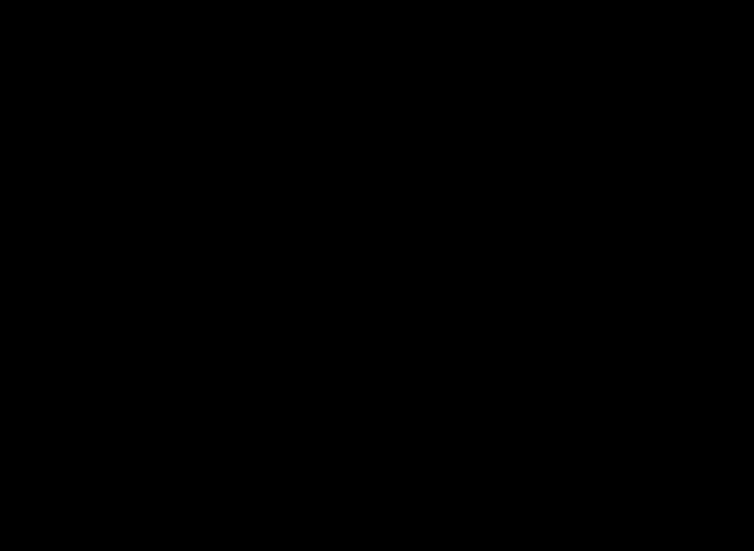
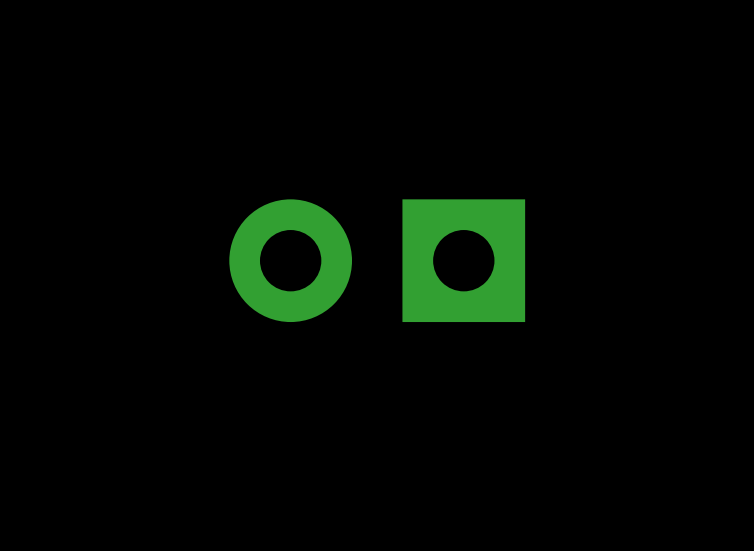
part: none -> (377, 260)

